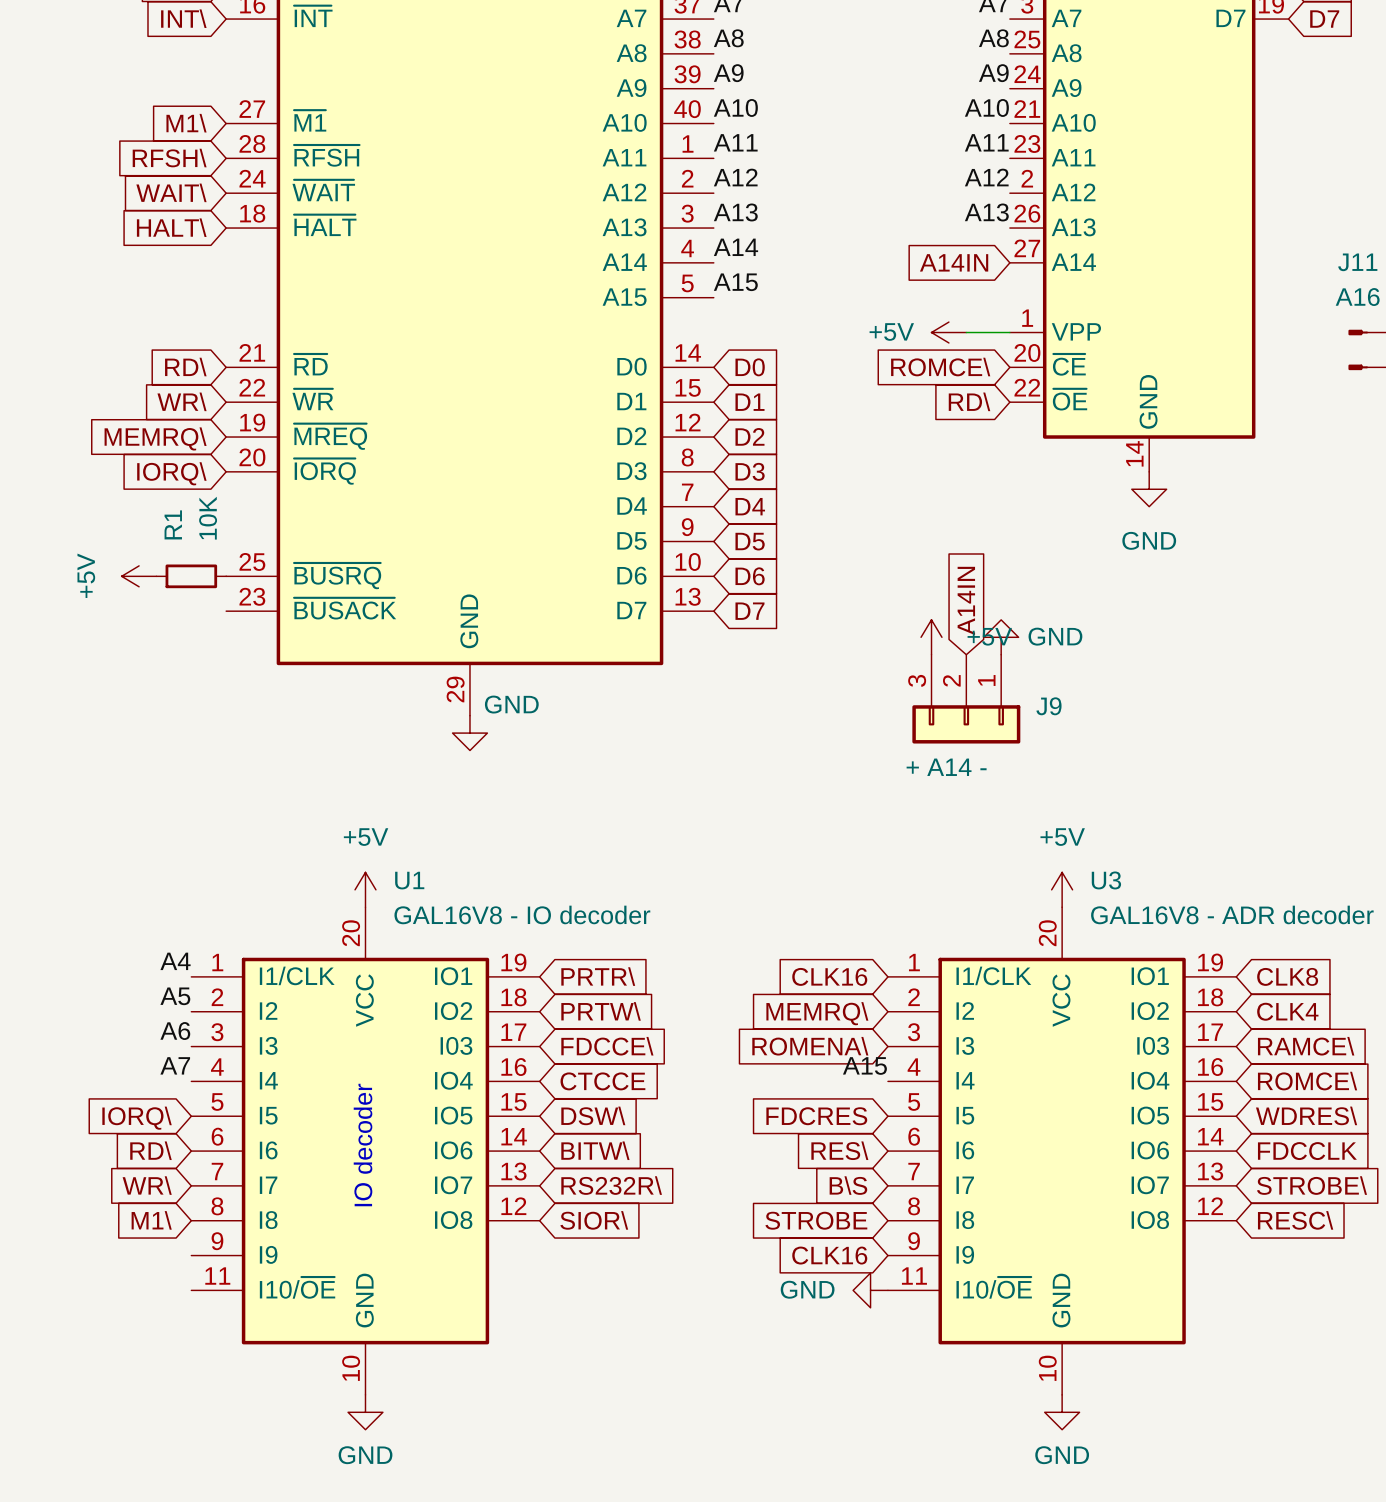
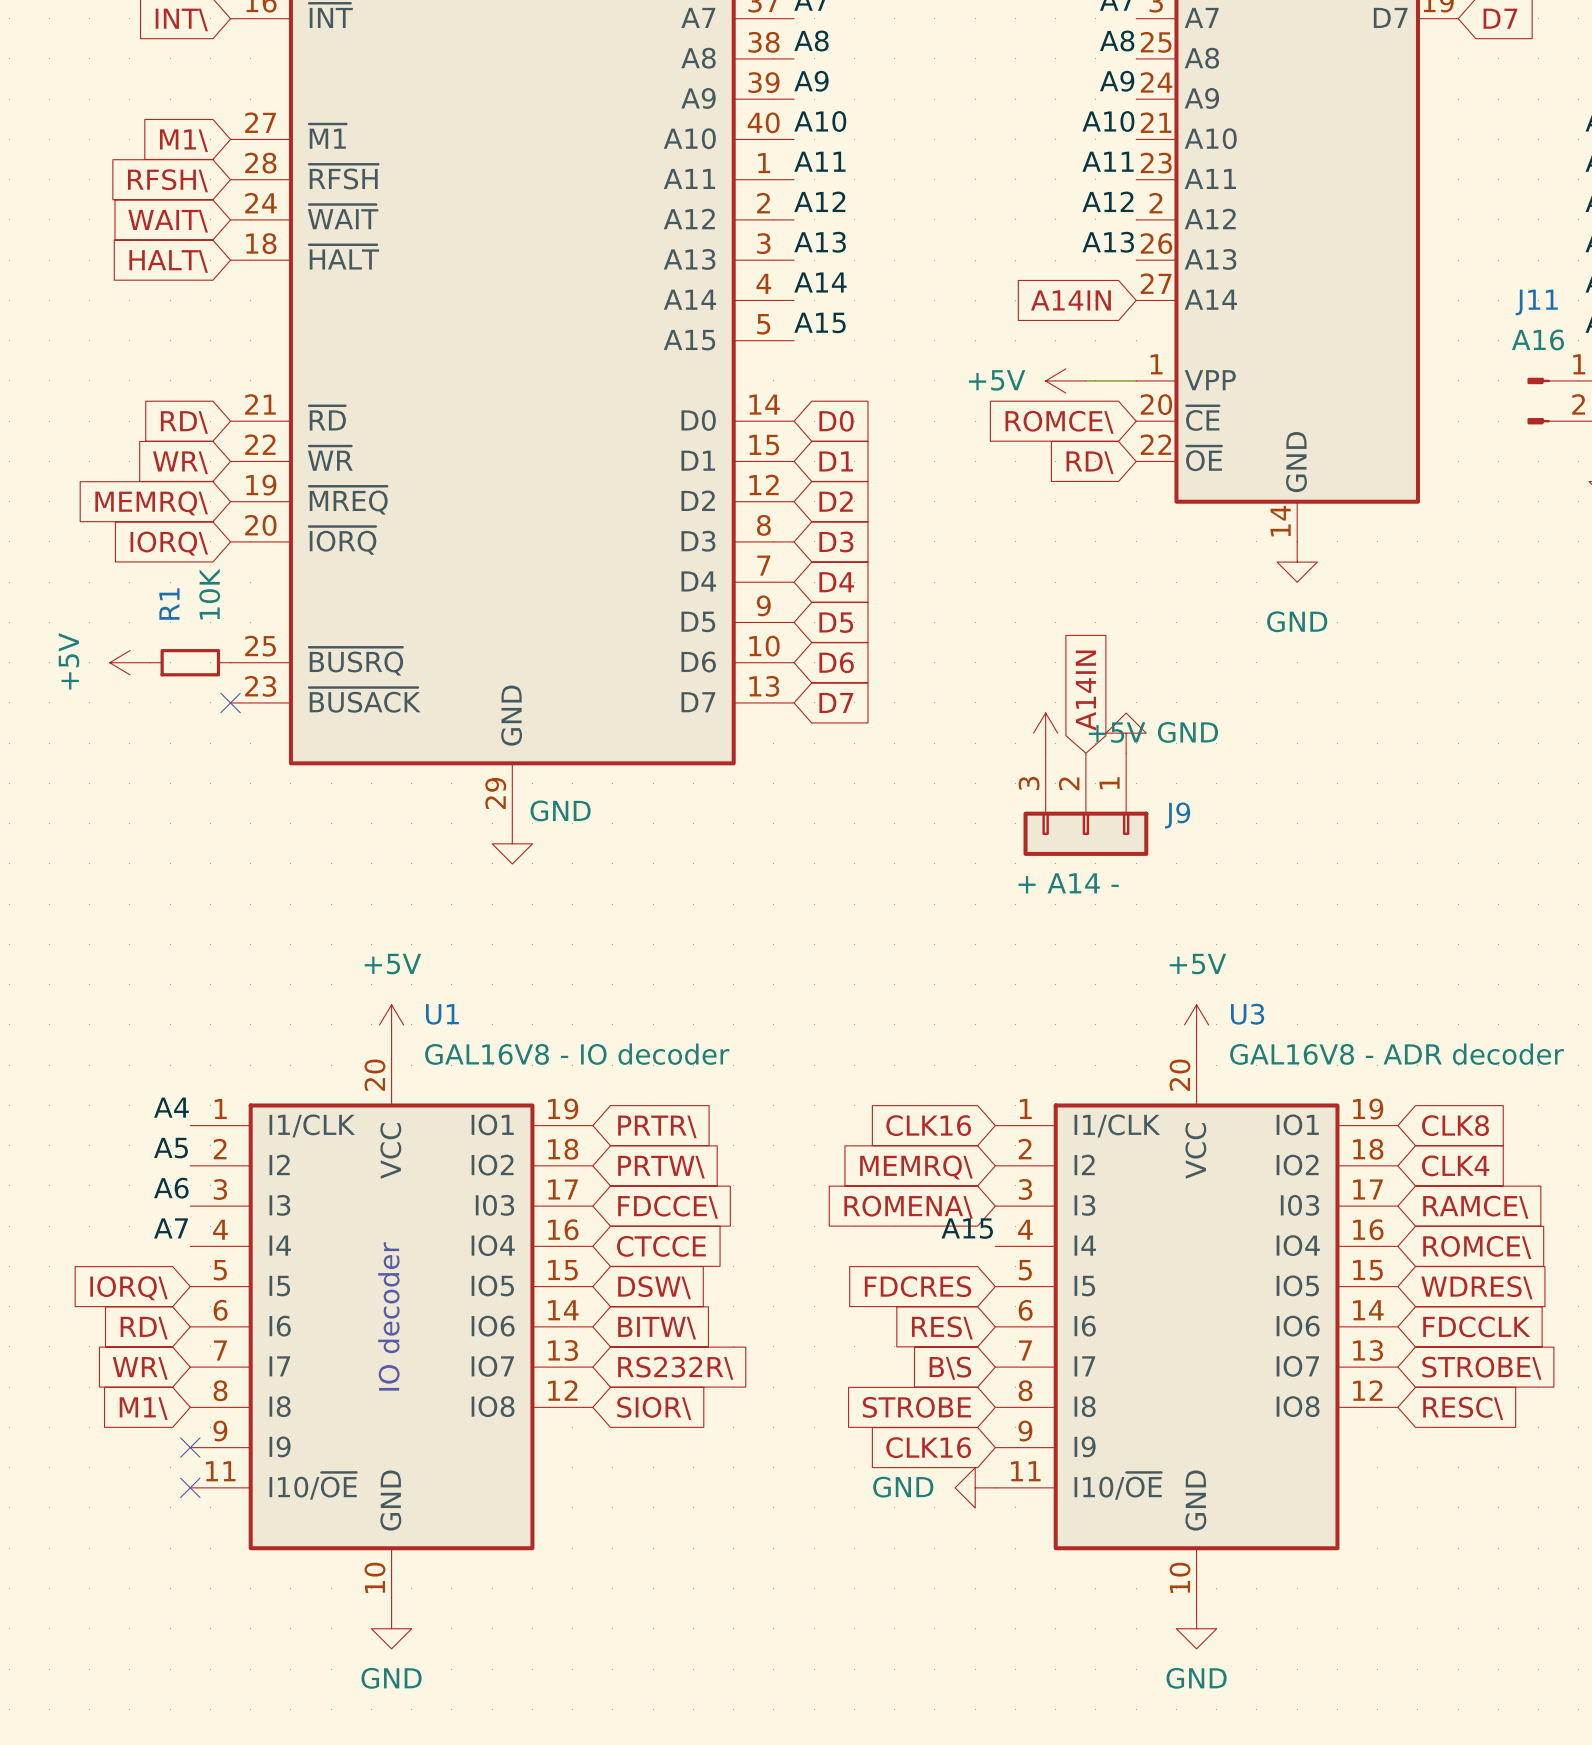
no-connect mark: none -> (230, 702)
no-connect mark: none -> (190, 1447)
no-connect mark: none -> (190, 1487)

